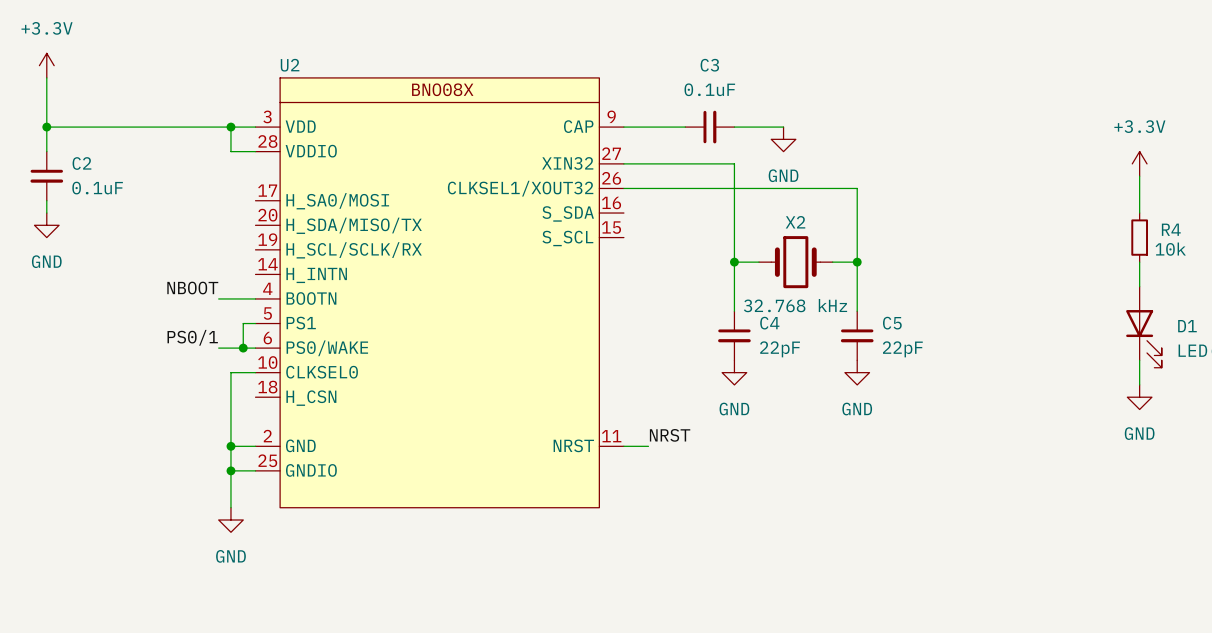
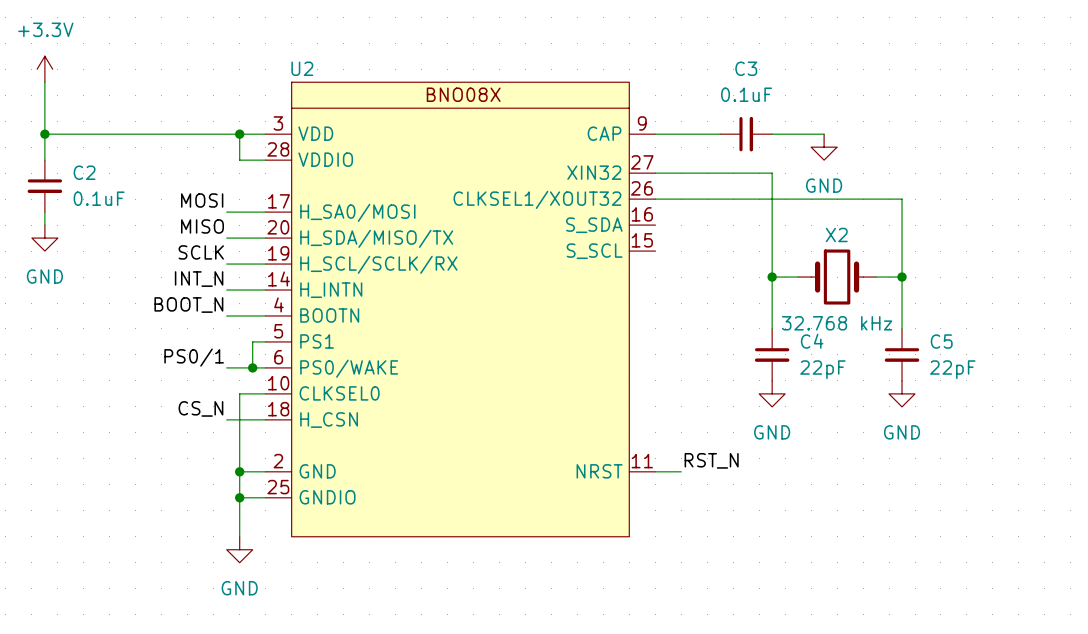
label: none -> MOSI (202, 200)
wire: none -> (226, 212) (265, 212)
label: none -> MISO (202, 226)
wire: none -> (226, 238) (265, 238)
label: none -> SCLK (201, 252)
wire: none -> (226, 264) (265, 264)
label: none -> INT_N (199, 279)
wire: none -> (226, 290) (265, 290)
label: NBOOT (192, 288) -> BOOT_N (188, 305)
label: none -> CS_N (200, 408)
wire: none -> (226, 419) (265, 419)
label: NRST (670, 435) -> RST_N (711, 460)

